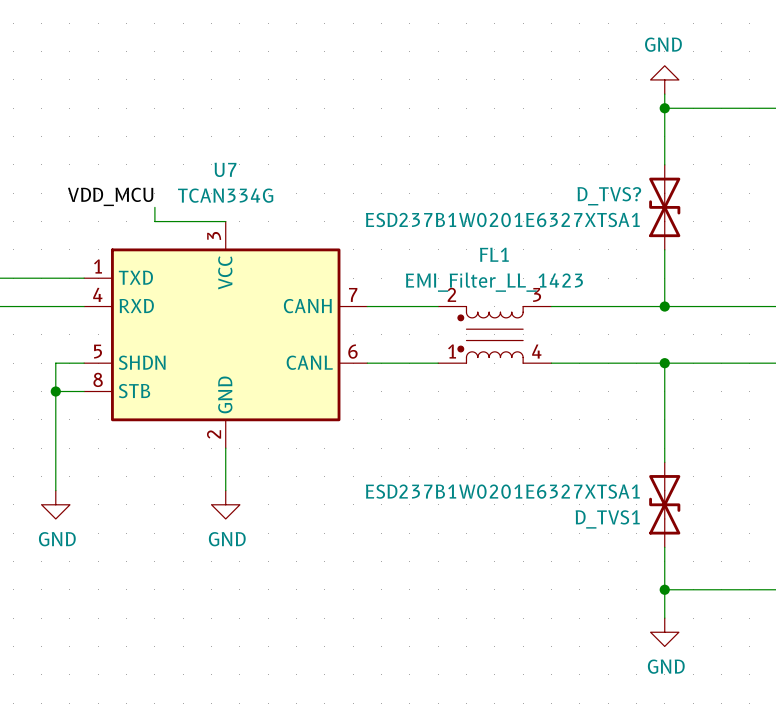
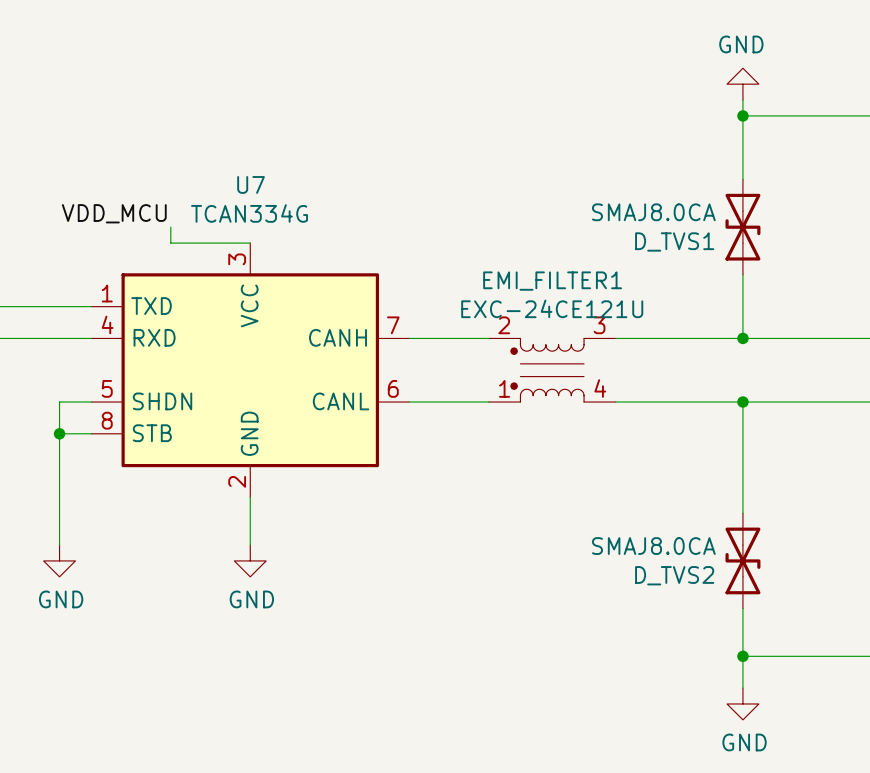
ESD237B1W0201E6327XTSA1 value: D_TVS? (609, 196) -> SMAJ8.0CA (653, 212)
ESD237B1W0201E6327XTSA1 name: ESD237B1W0201E6327XTSA1 (502, 219) -> D_TVS1 (674, 241)
FL1 name: FL1 (494, 254) -> EMI_FILTER1 (552, 281)
FL1 value: EMI_Filter_LL_1423 (494, 282) -> EXC-24CE121U (552, 308)
D_TVS1 value: ESD237B1W0201E6327XTSA1 (502, 491) -> SMAJ8.0CA (653, 546)
D_TVS1 name: D_TVS1 (607, 519) -> D_TVS2 (674, 575)

